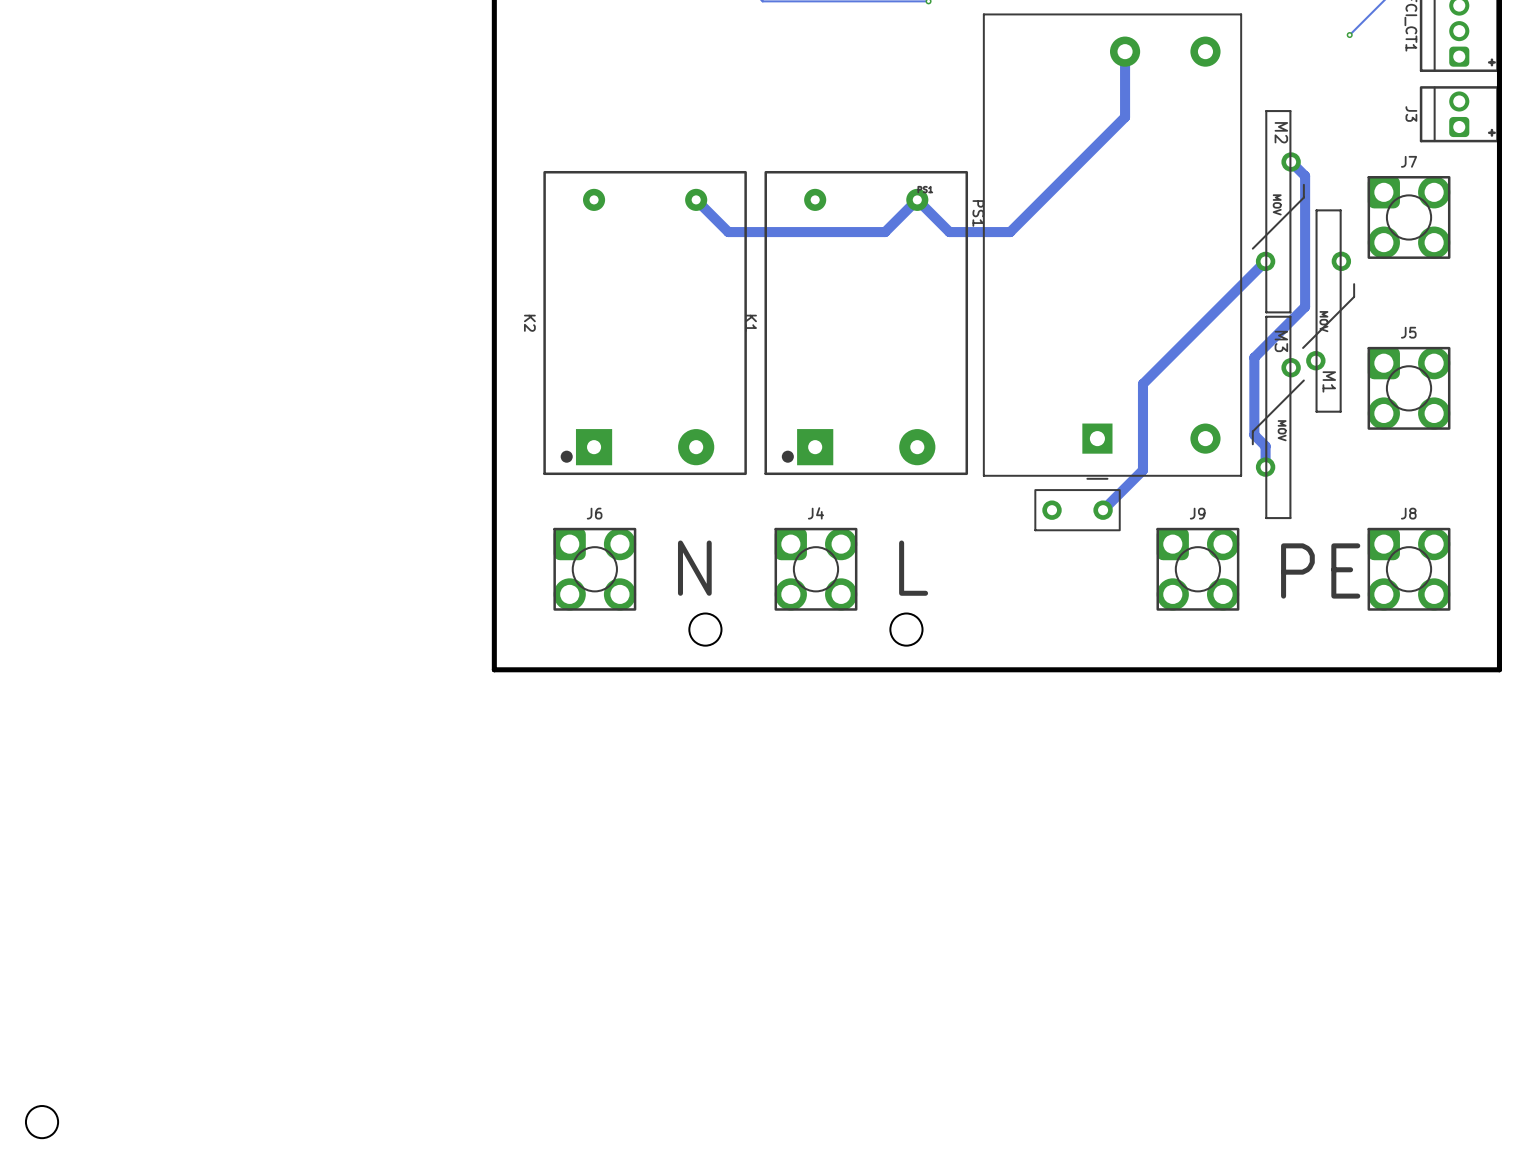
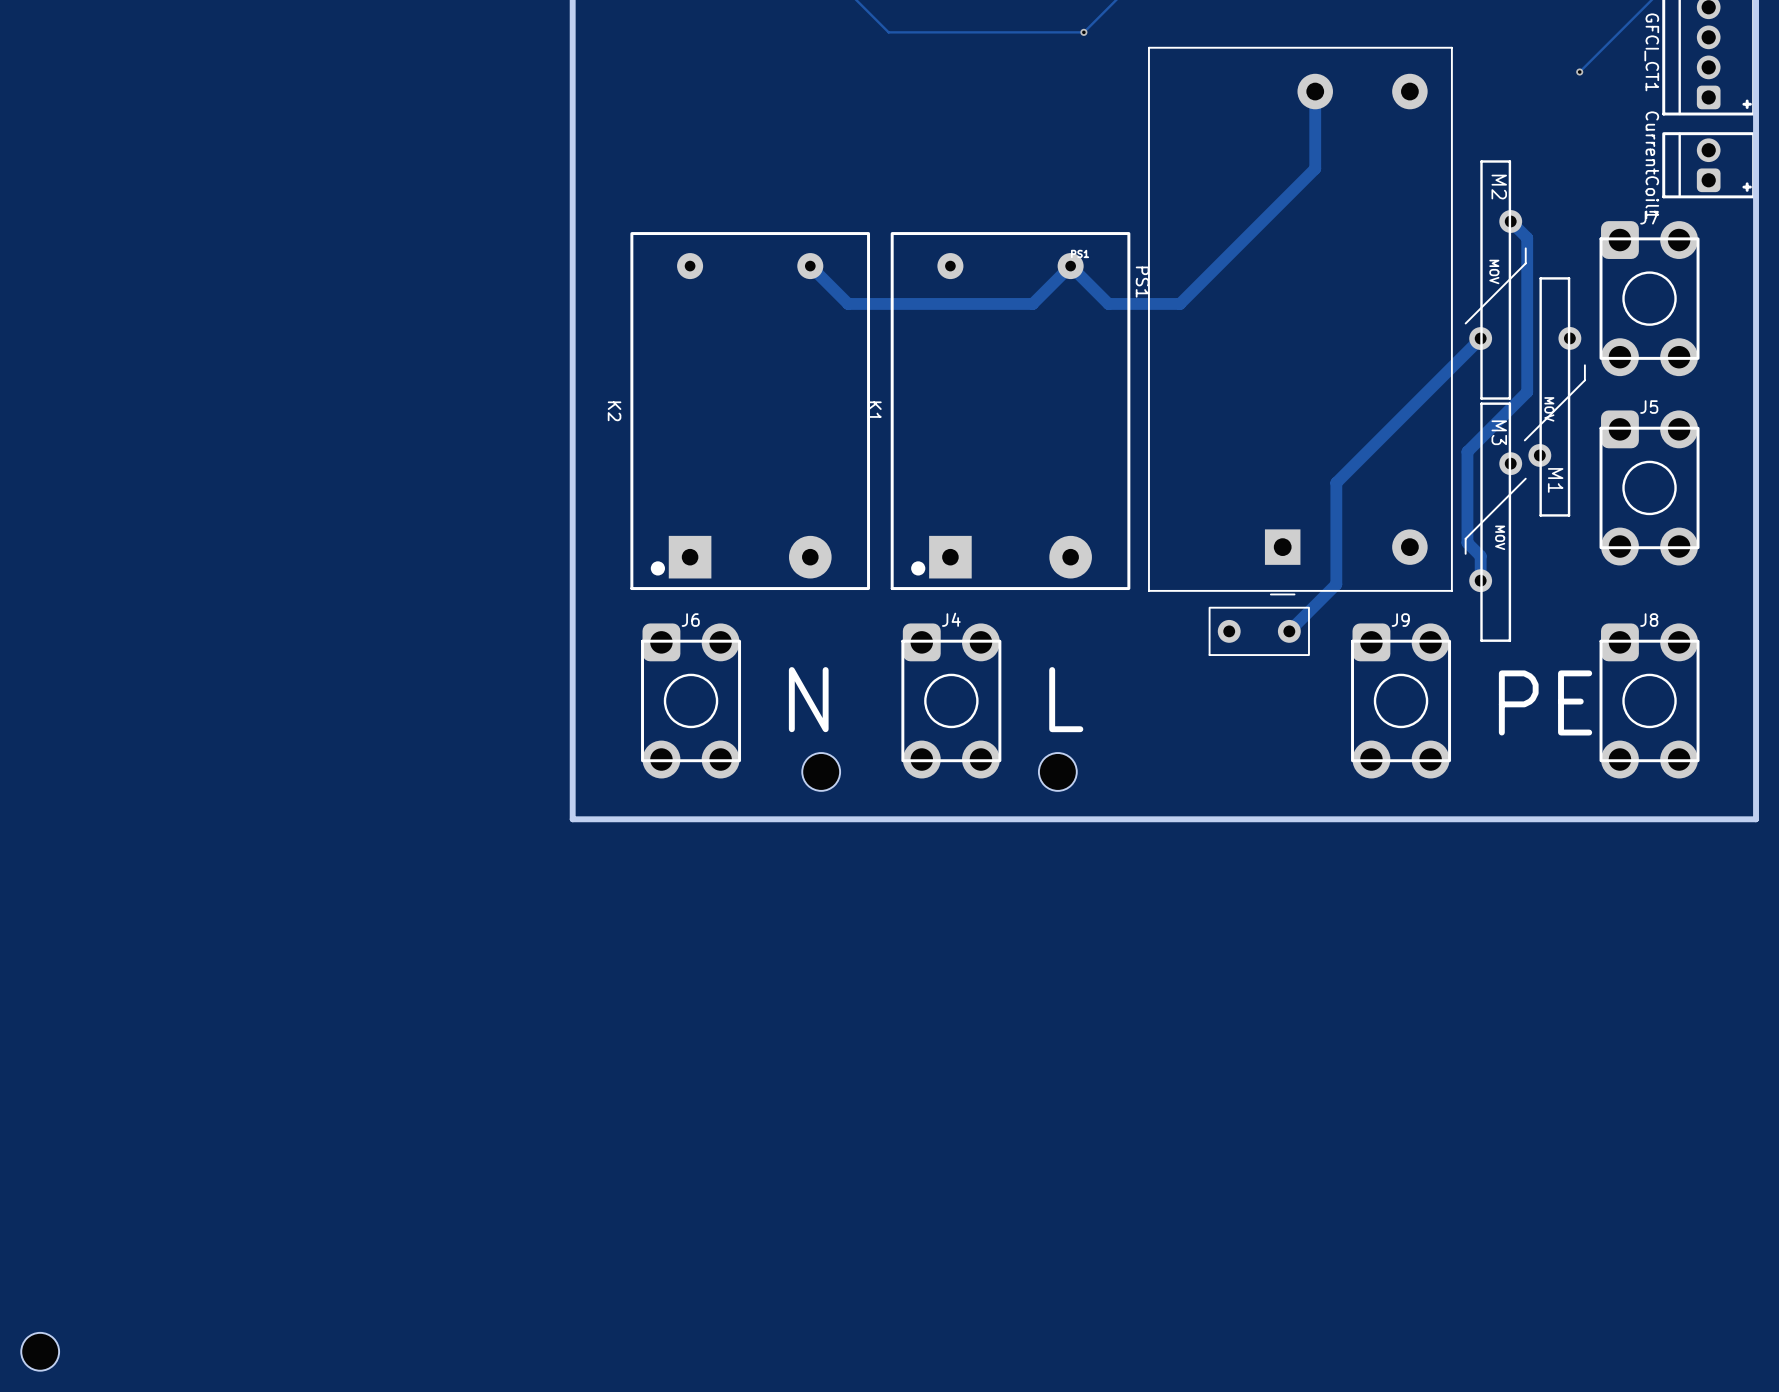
J3 name: J3 (1411, 114) -> CurrentCoil1 (1652, 165)
J7 footprint: [1367, 176, 1451, 259] -> [1599, 221, 1700, 377]
J5 footprint: [1367, 346, 1451, 430] -> [1599, 410, 1700, 566]
J6 footprint: [553, 527, 637, 611] -> [641, 623, 742, 779]
J4 footprint: [774, 527, 858, 611] -> [901, 623, 1002, 779]
J9 footprint: [1156, 527, 1240, 611] -> [1351, 623, 1452, 779]
J8 footprint: [1367, 527, 1451, 611] -> [1599, 623, 1700, 779]

